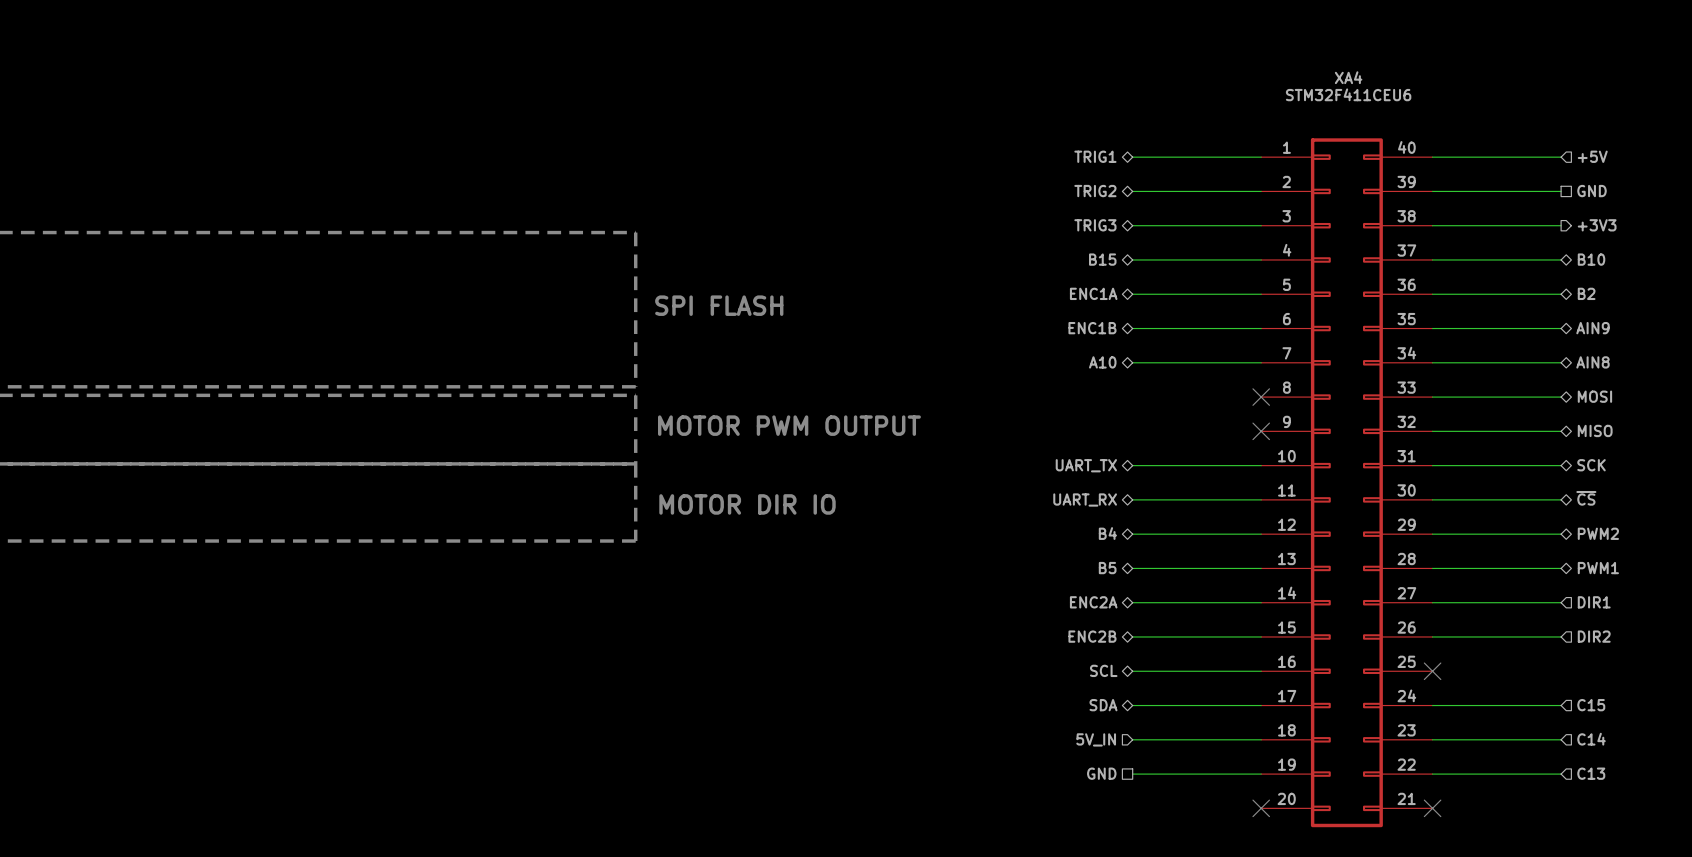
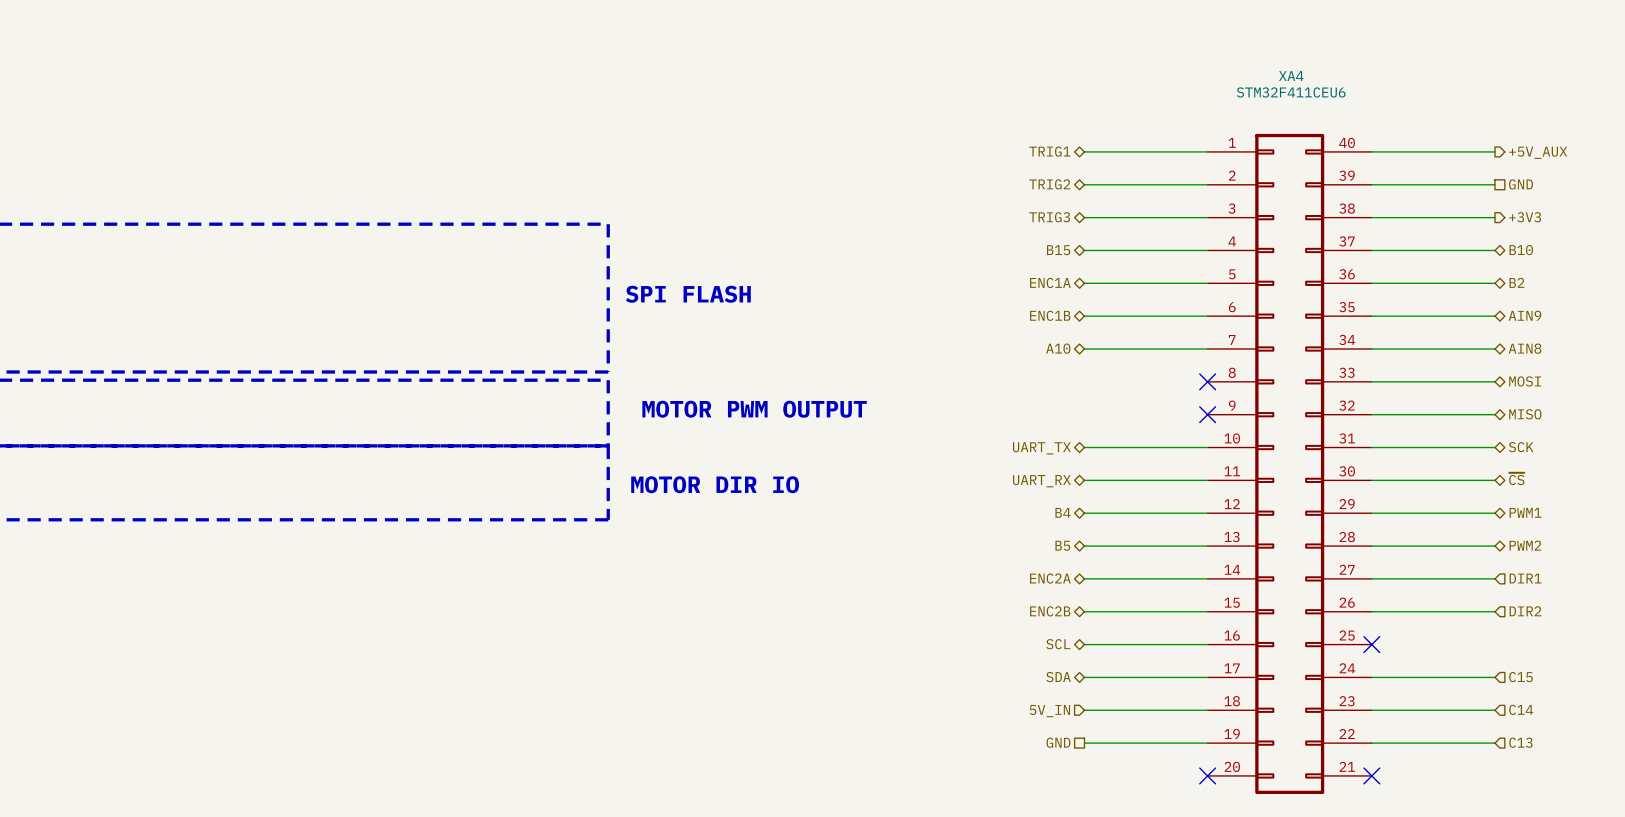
hierarchical label shape: input (1592, 156) -> output (1538, 152)
hierarchical label: +5V (1592, 156) -> +5V_AUX (1538, 152)
hierarchical label: PWM2 (1598, 533) -> PWM1 (1525, 512)
hierarchical label: PWM1 (1598, 568) -> PWM2 (1525, 545)

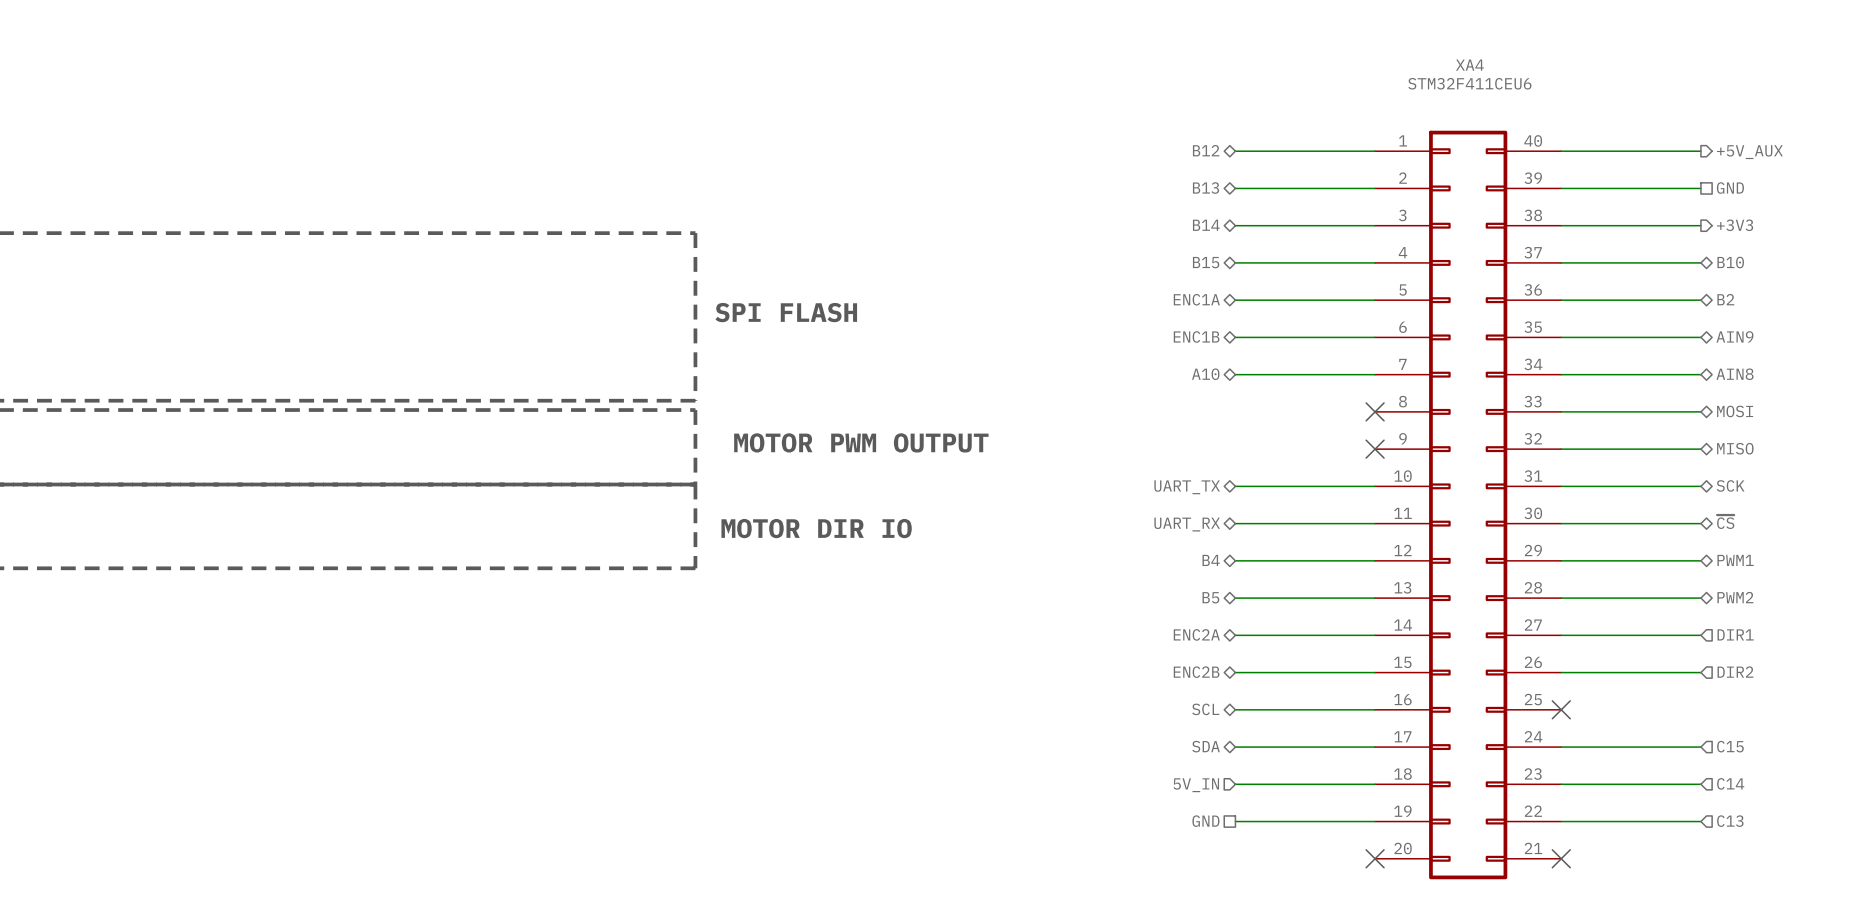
hierarchical label: TRIG1 (1049, 151) -> B12 (1206, 150)
hierarchical label: TRIG2 (1049, 184) -> B13 (1205, 188)
hierarchical label: TRIG3 (1049, 217) -> B14 (1206, 225)

